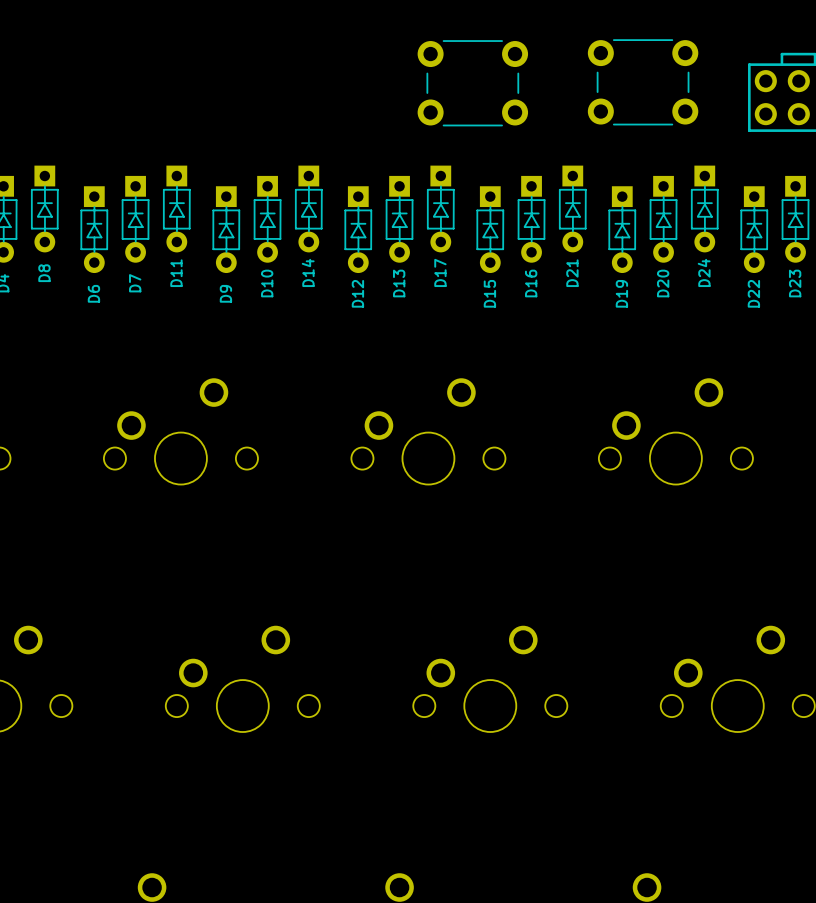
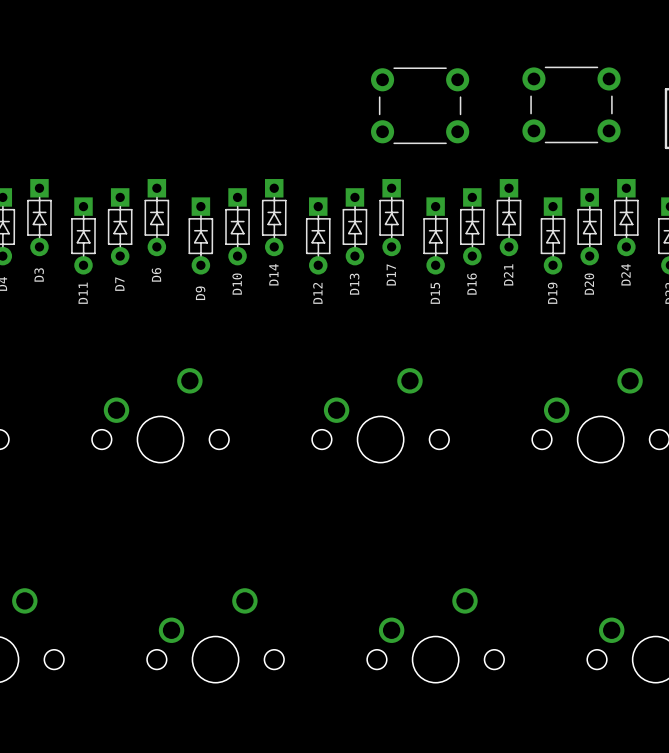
D8 name: D8 (44, 273) -> D3 (39, 274)
D11 name: D11 (176, 273) -> D6 (156, 274)
D6 name: D6 (93, 293) -> D11 (83, 293)

